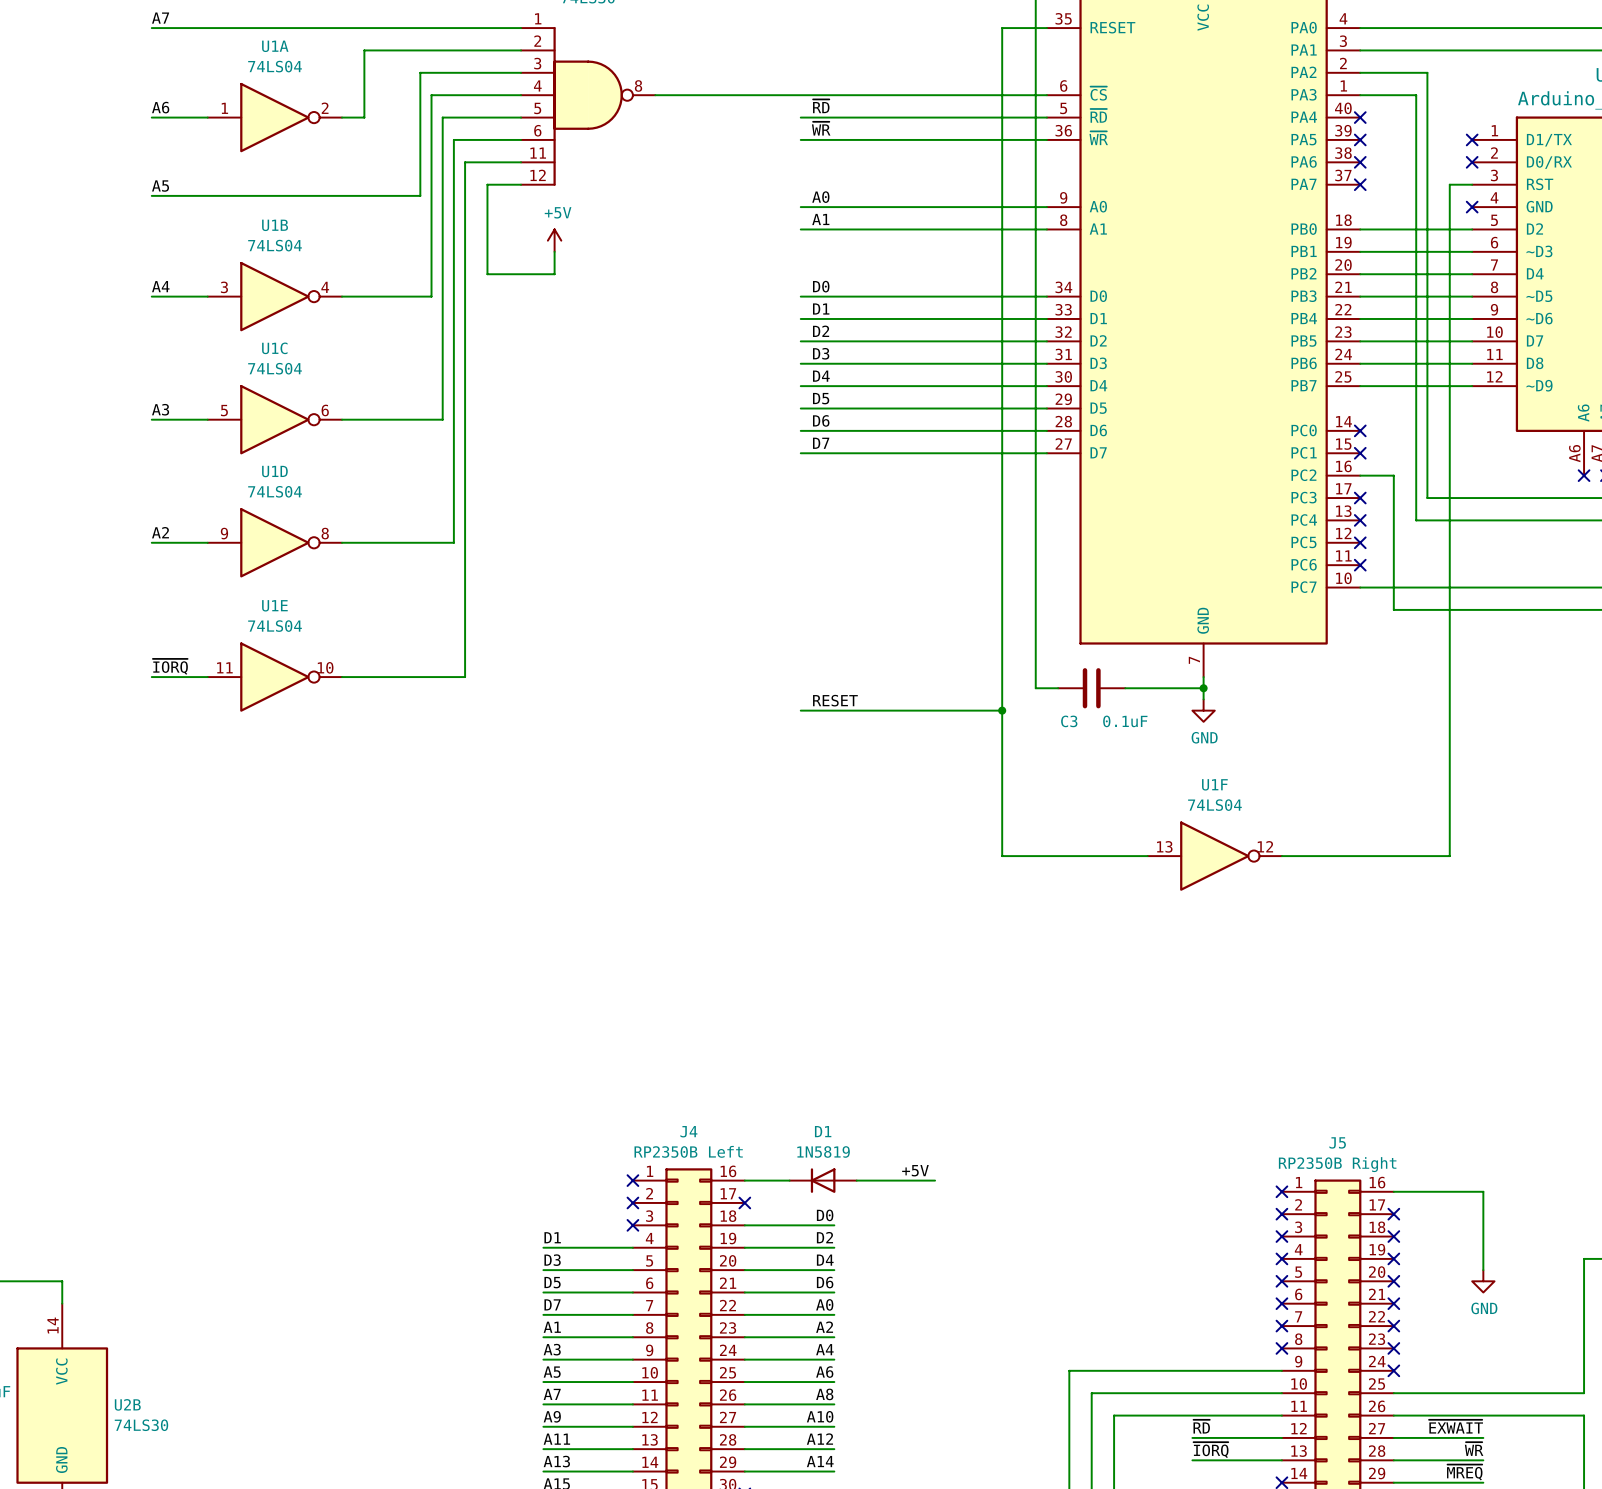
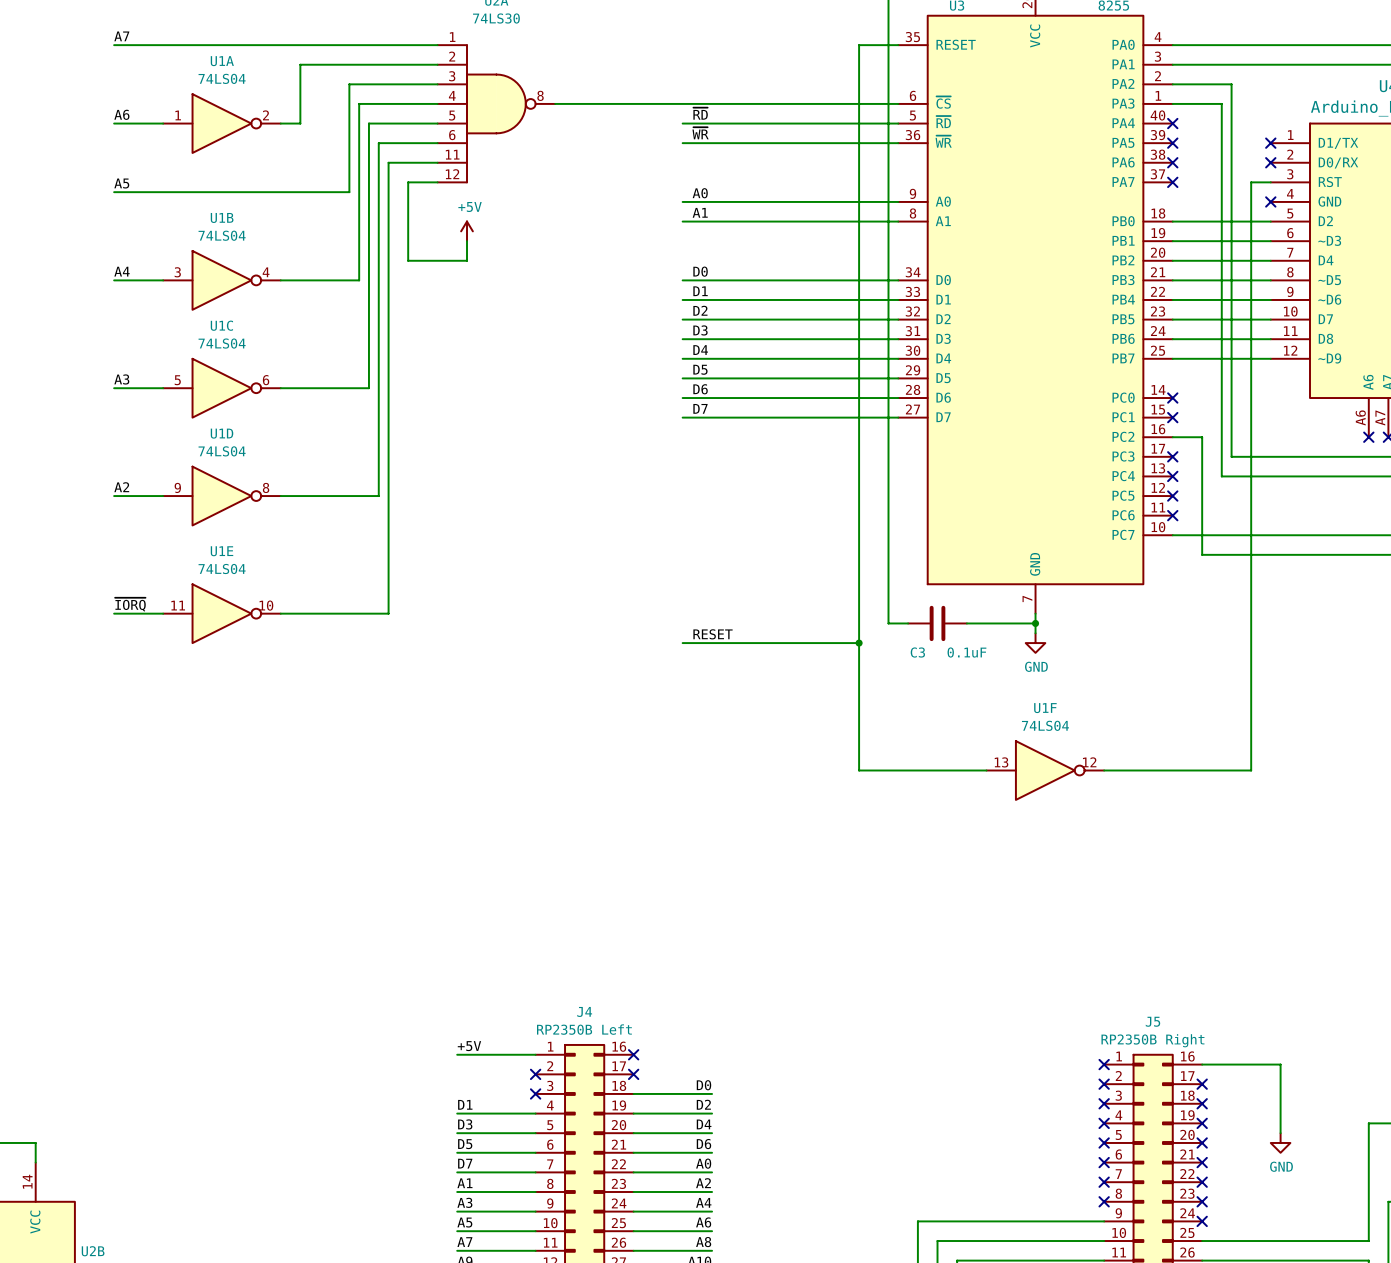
label: none -> +5V (469, 1046)
label: +5V (915, 1170) -> none
wire: none -> (457, 1054) (535, 1054)
no-connect mark: (632, 1180) -> none
wire: (744, 1180) (789, 1180) -> none
no-connect mark: none -> (633, 1054)
D1: 1N5819 (823, 1180) -> none
wire: (856, 1180) (935, 1180) -> none

